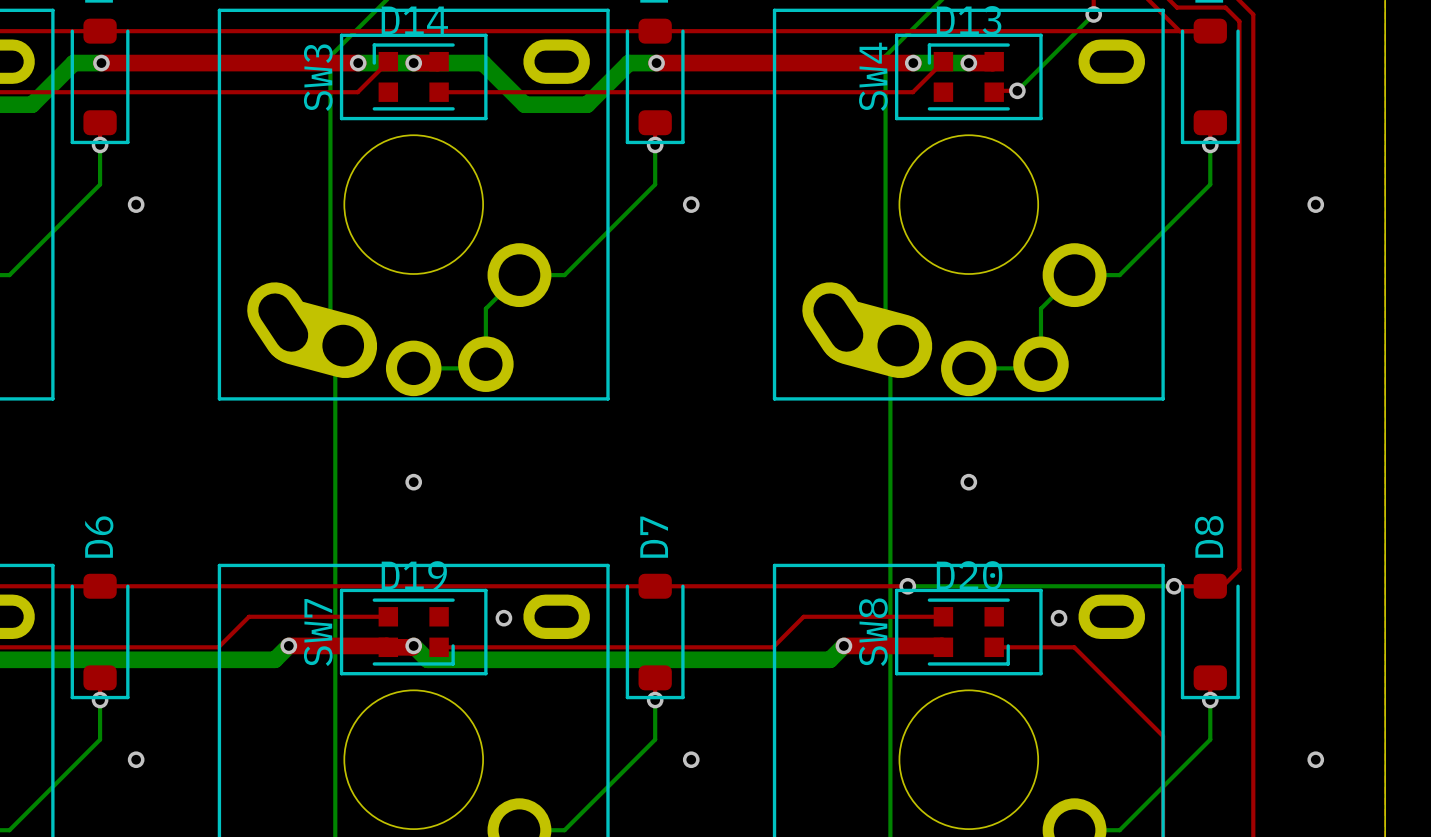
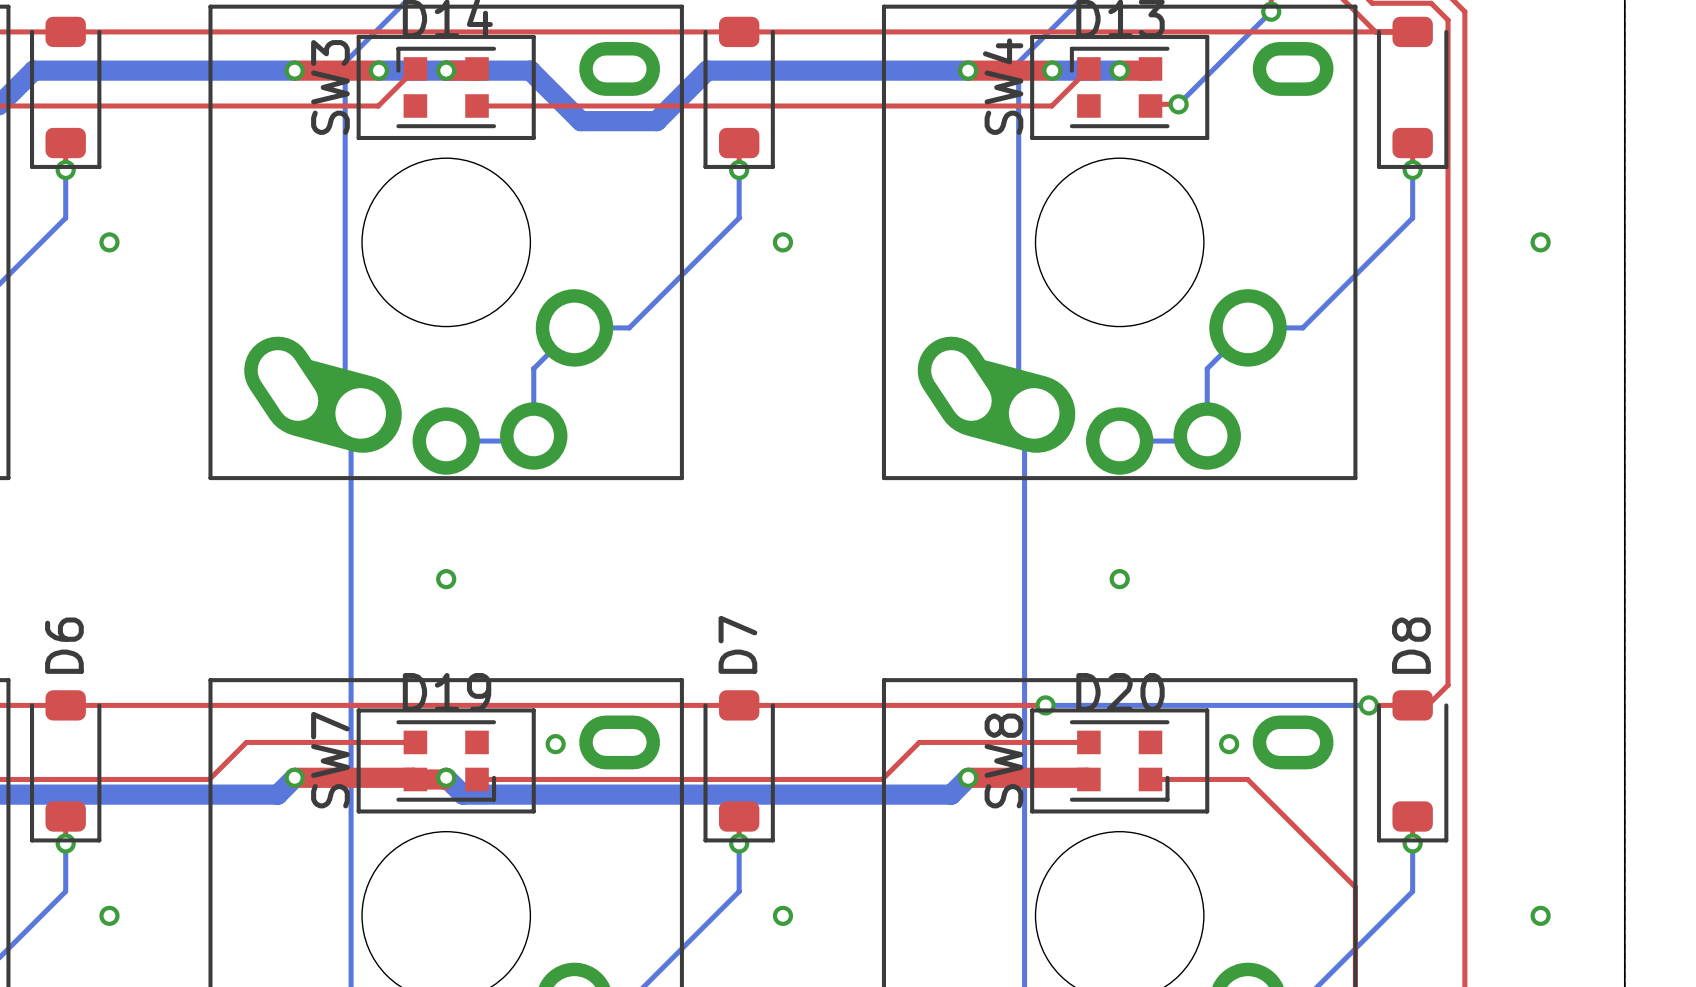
top track: (101, 63) (288, 63) -> none
bottom track: none -> (67, 70) (294, 70)
via: (101, 63) -> none
via: none -> (294, 70)
top track: (656, 63) (843, 63) -> none
bottom track: none -> (740, 70) (968, 70)
via: (656, 63) -> none
via: none -> (968, 70)

